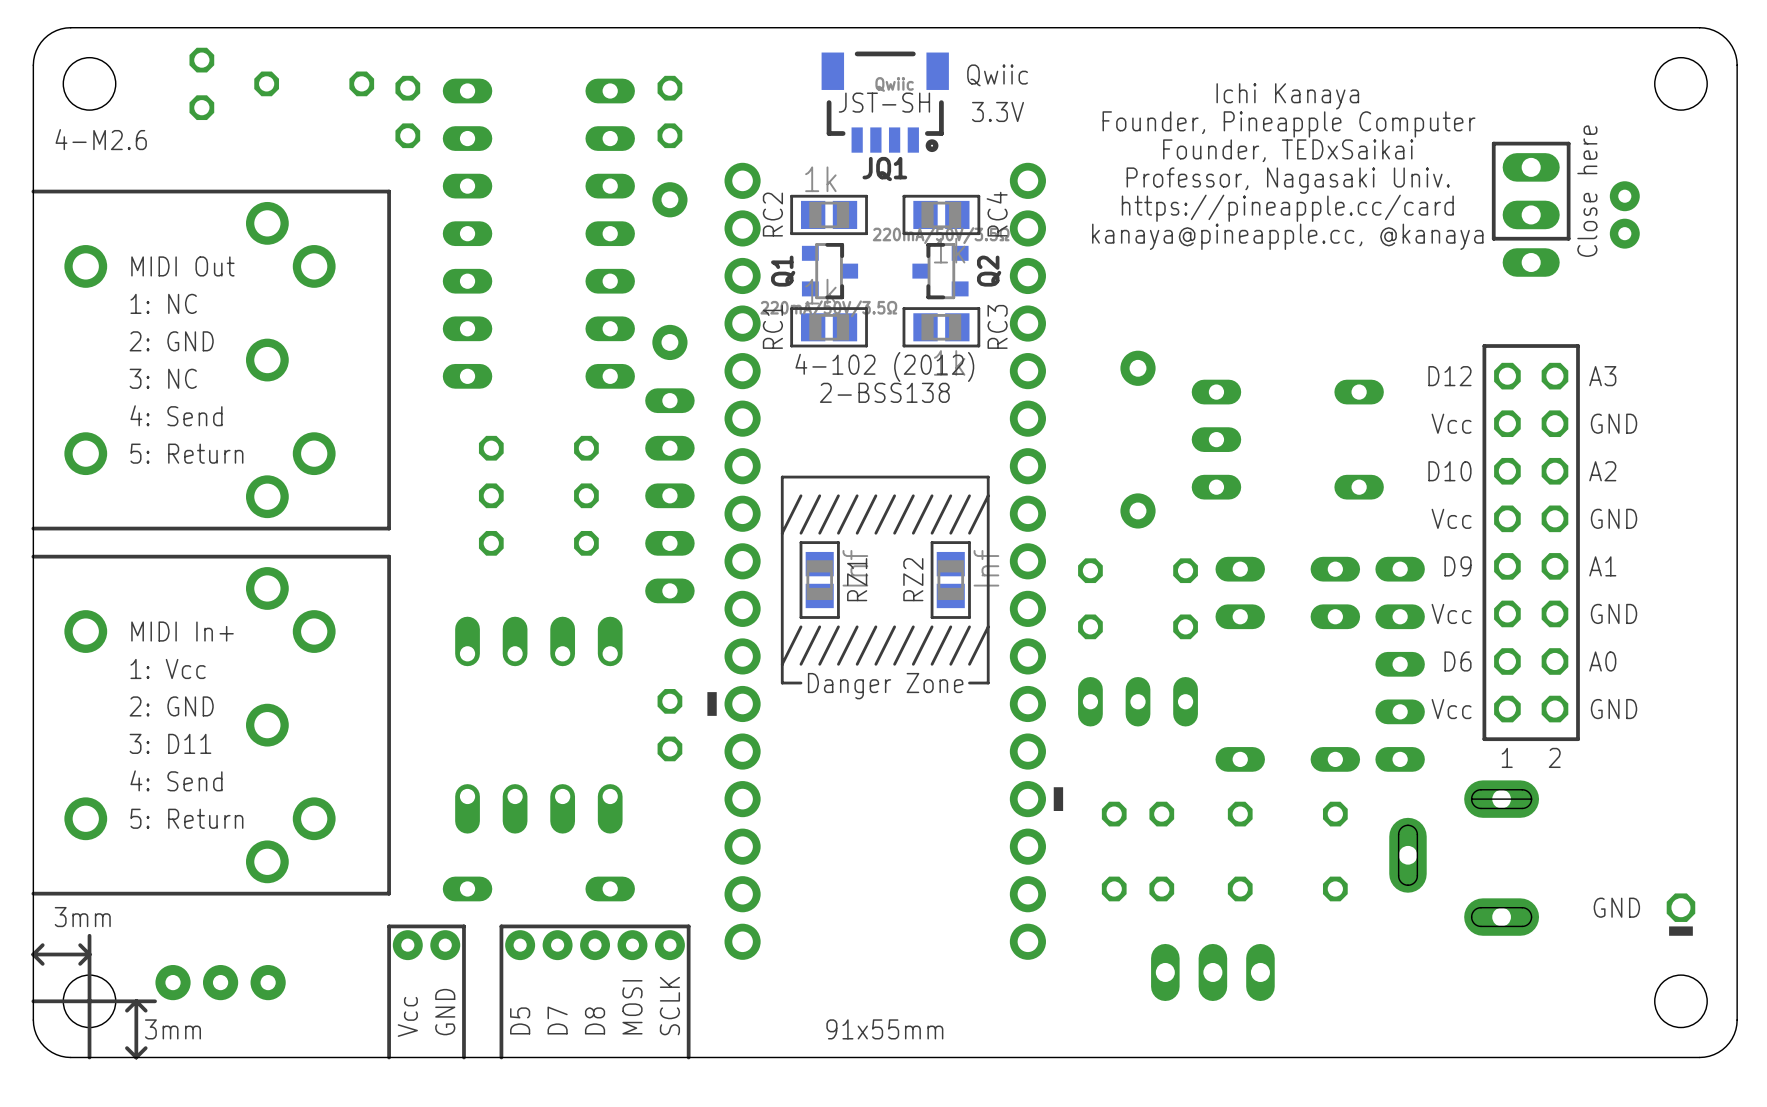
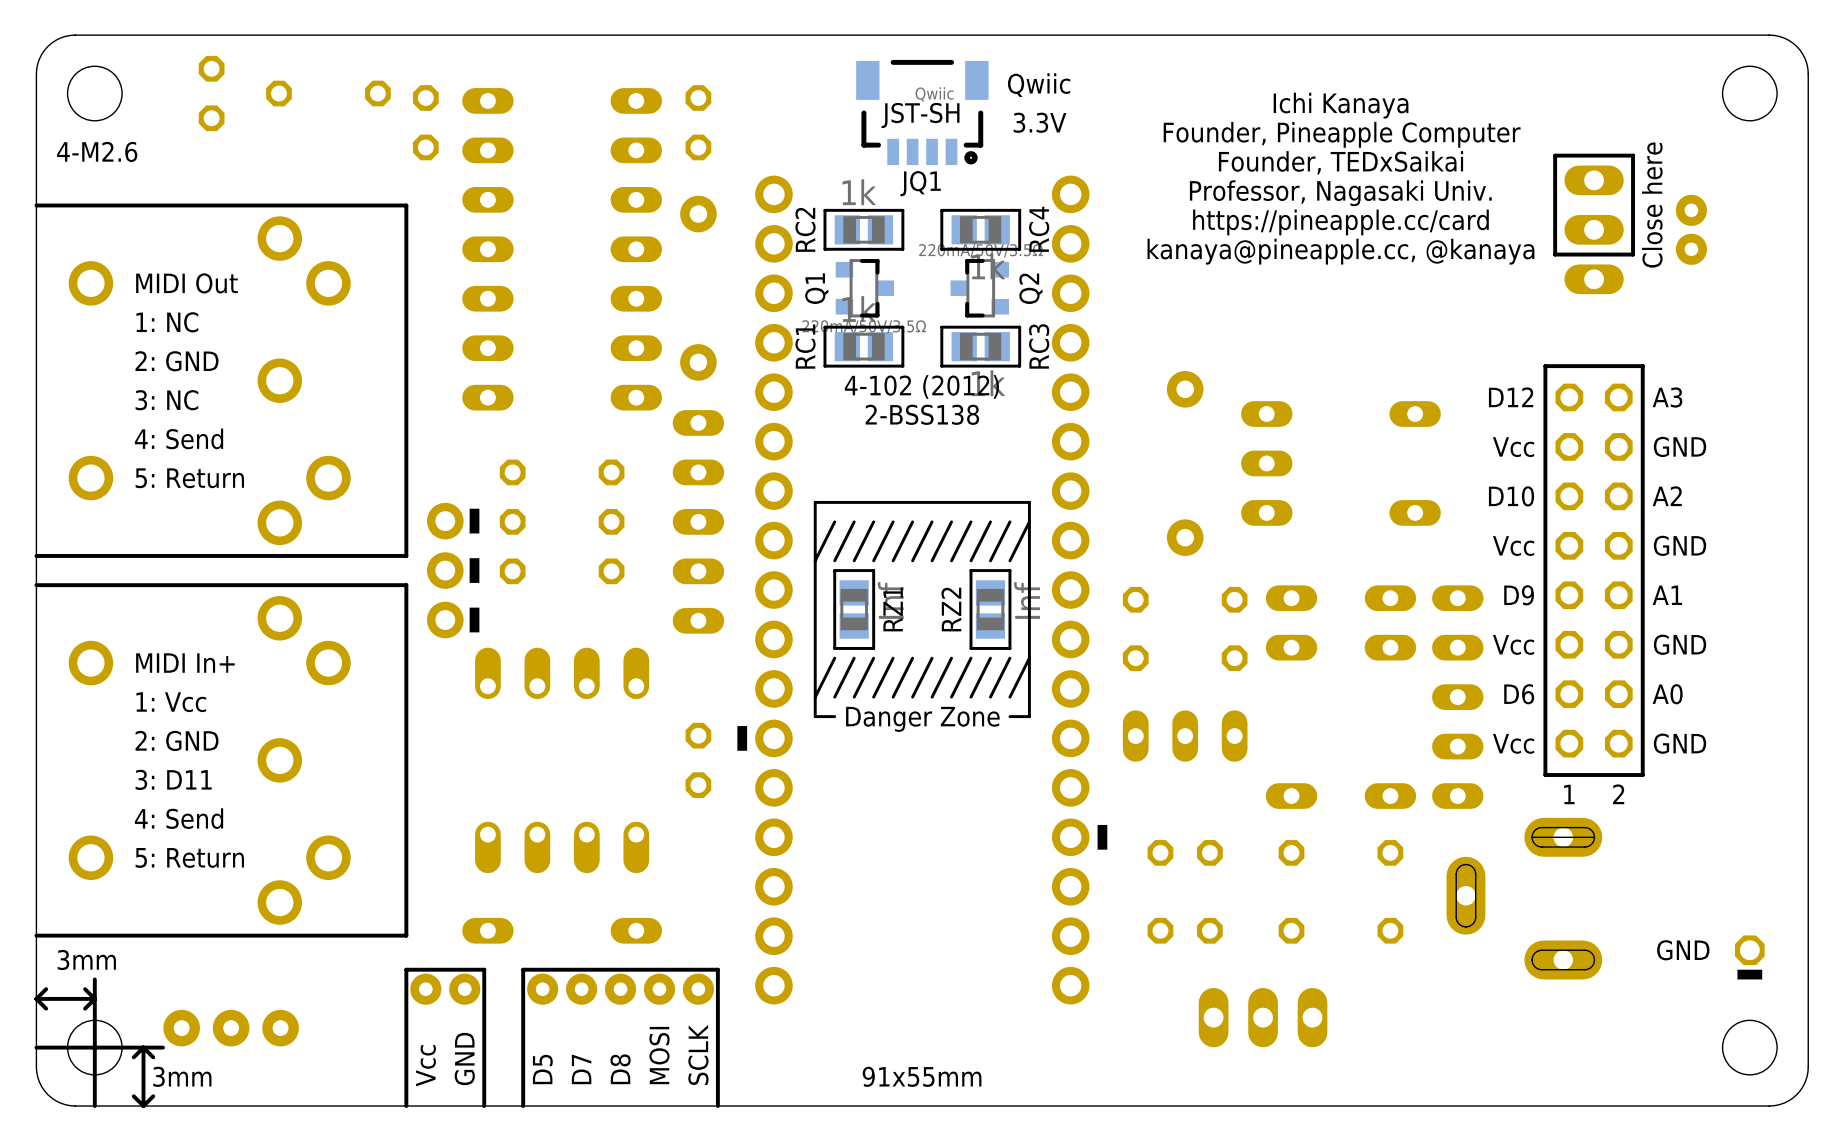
drawing: none -> [469, 508, 480, 534]
drawing: none -> [469, 558, 480, 583]
part: none -> (445, 570)
drawing: none -> [469, 607, 480, 633]

